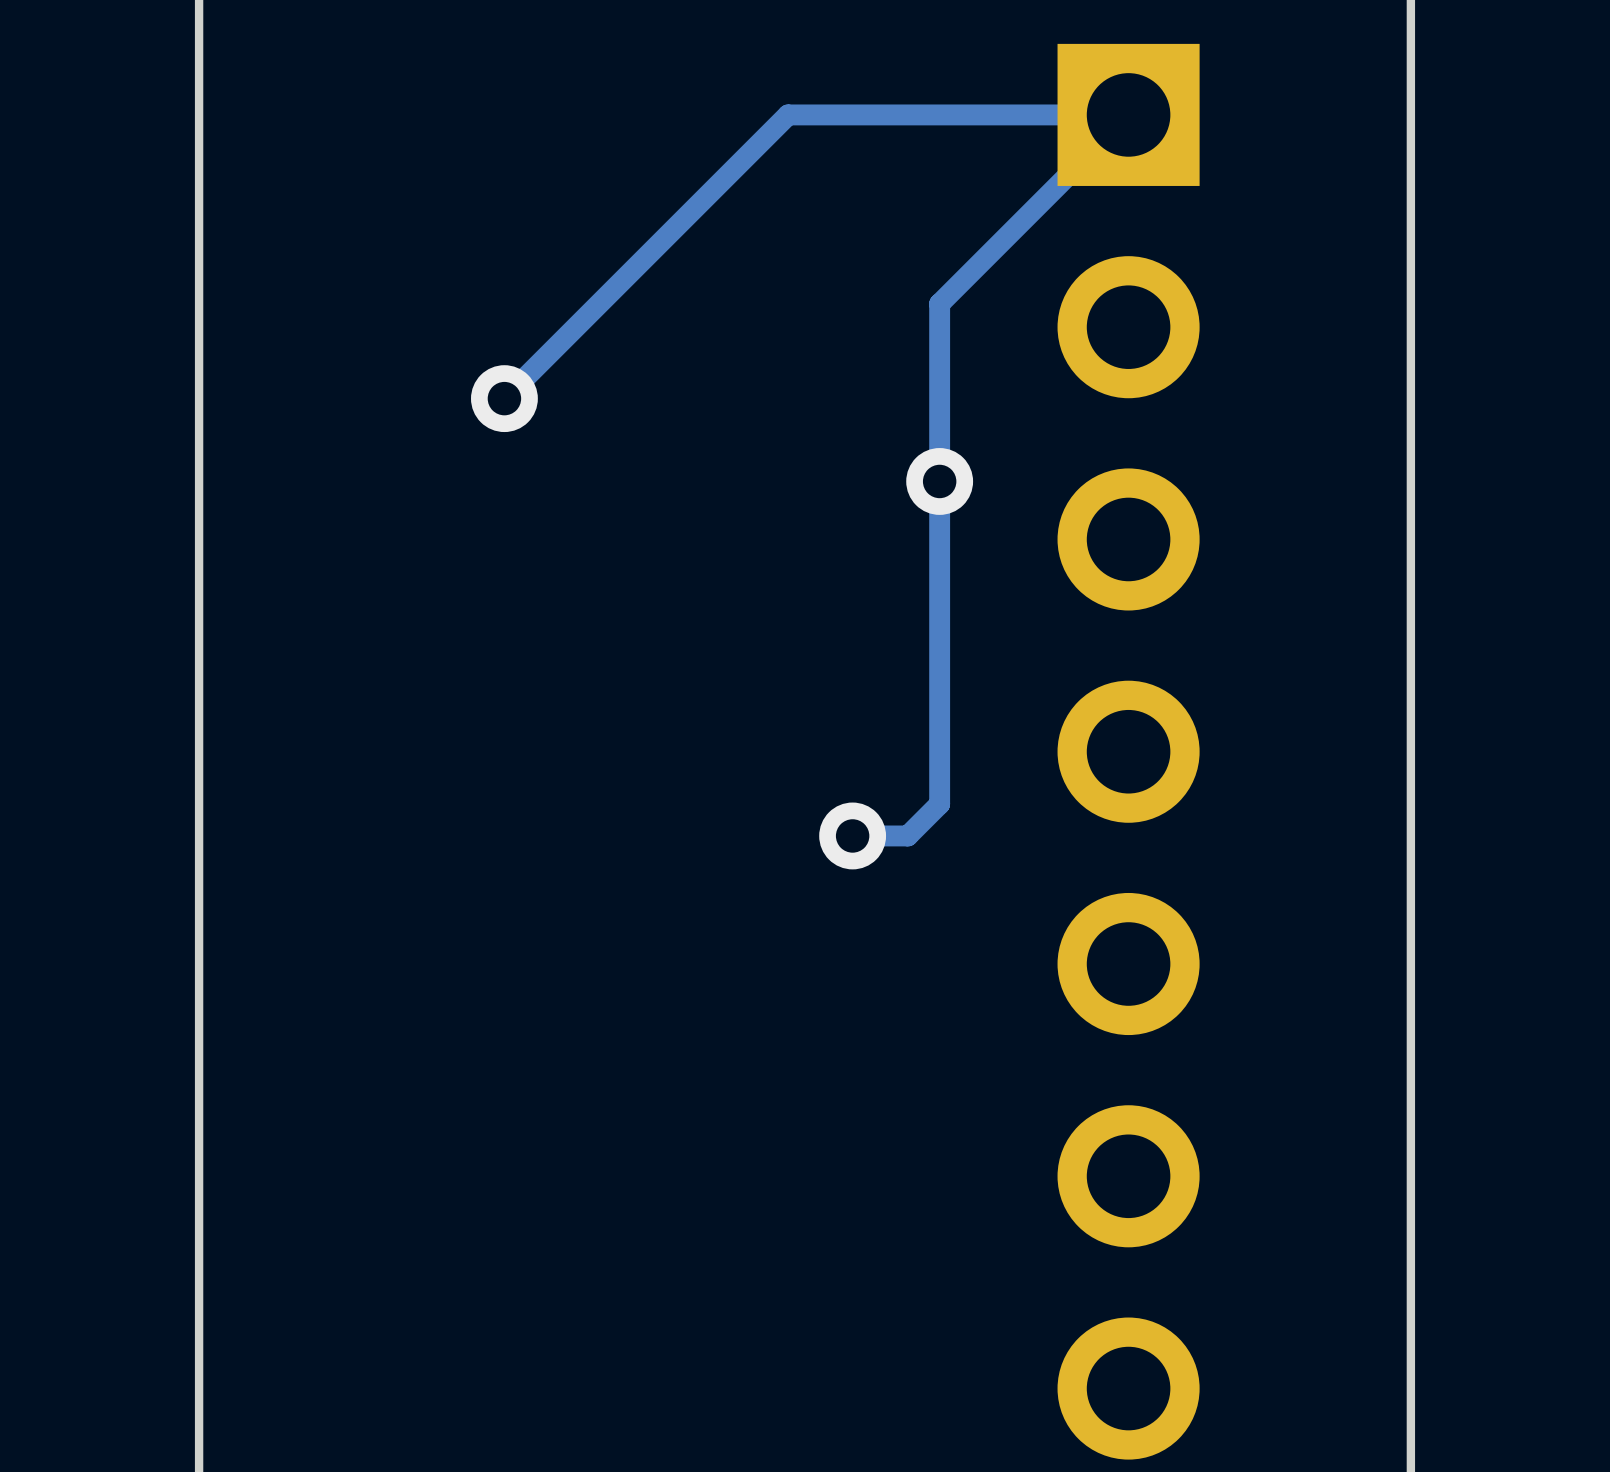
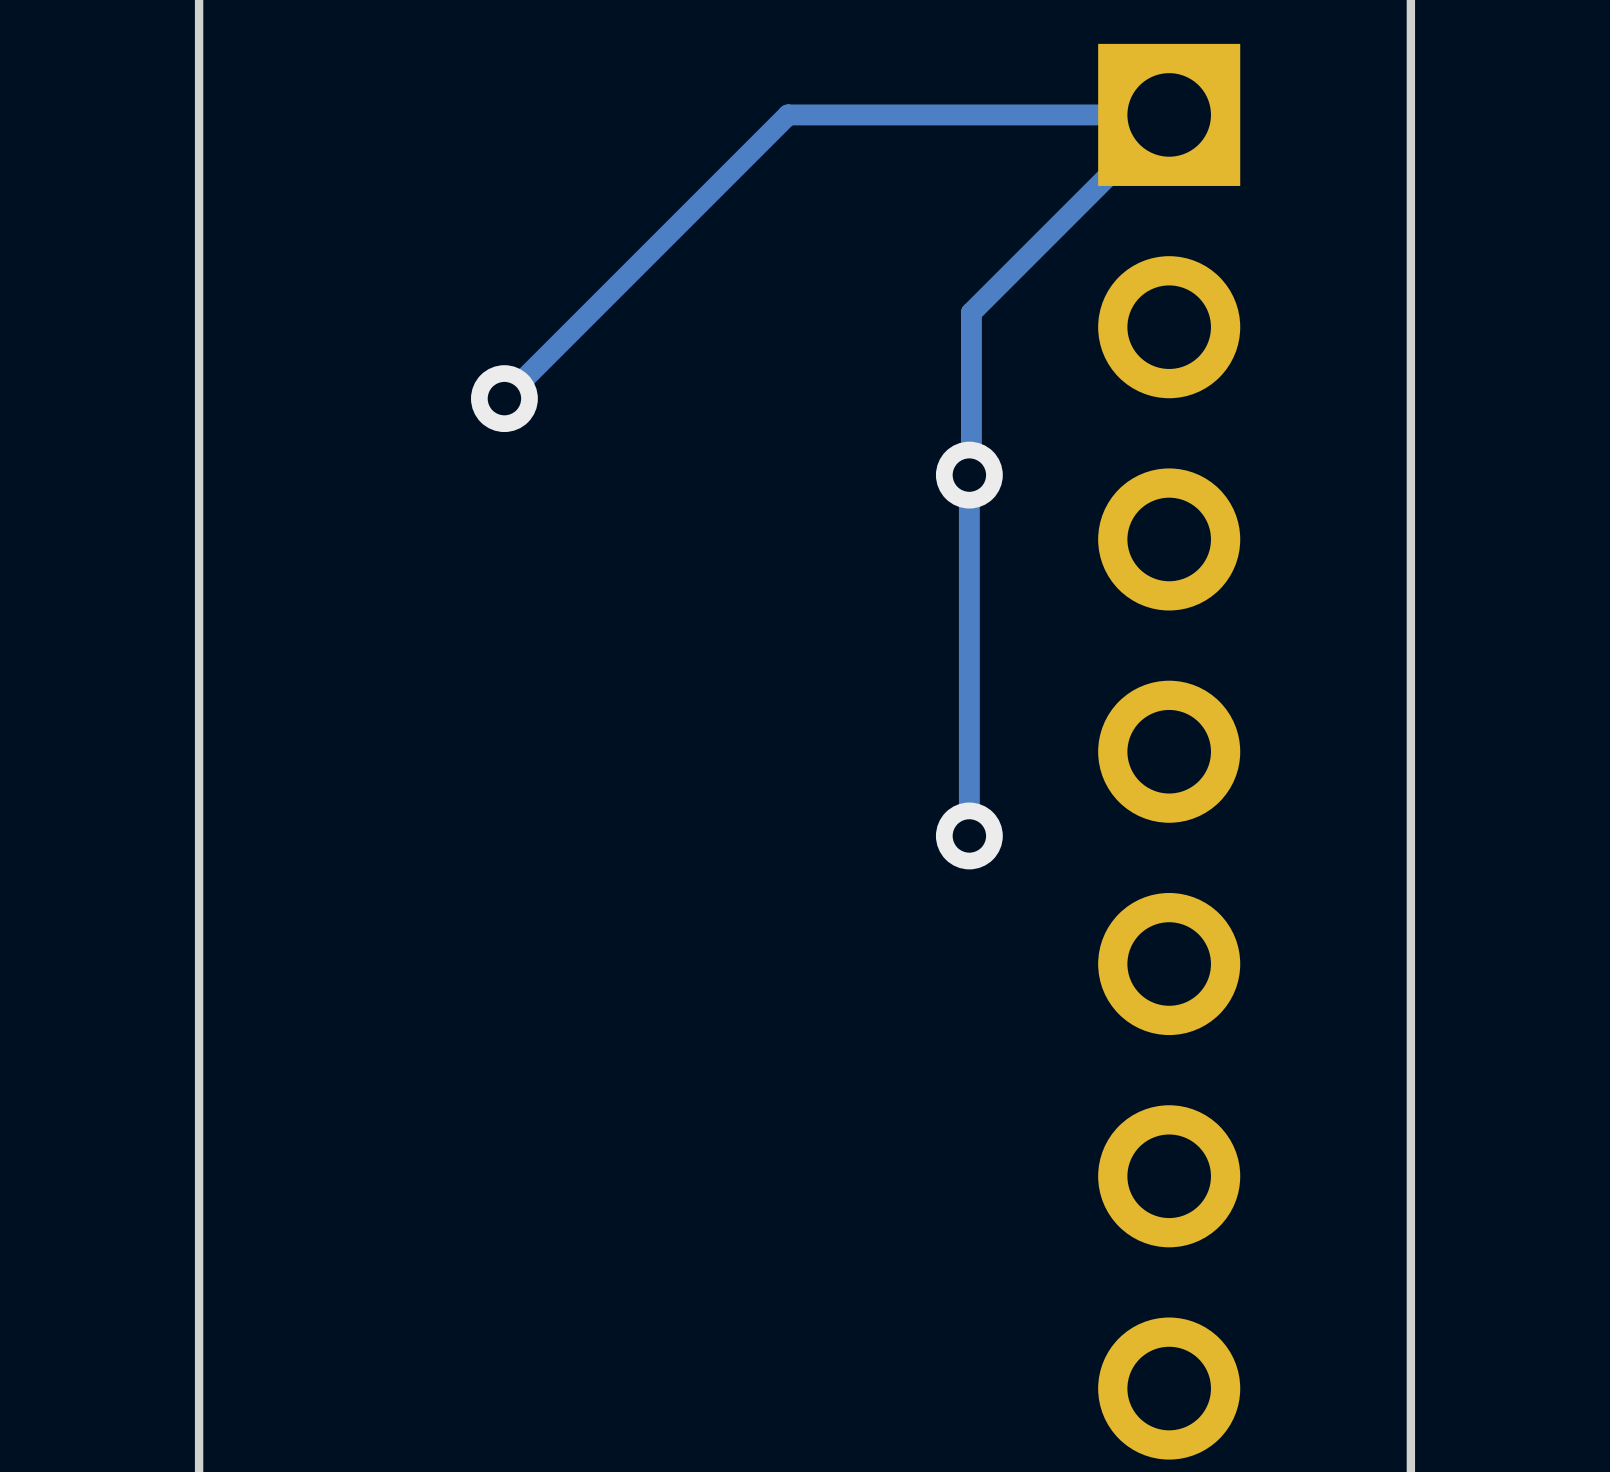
track: (1128, 114) (939, 303) (939, 804) (907, 835) (852, 835) -> (1128, 114) (1169, 114) (971, 312) (969, 835)
via position: (939, 481) -> (969, 475)
part position: (1128, 751) -> (1169, 751)
via position: (852, 835) -> (969, 835)

